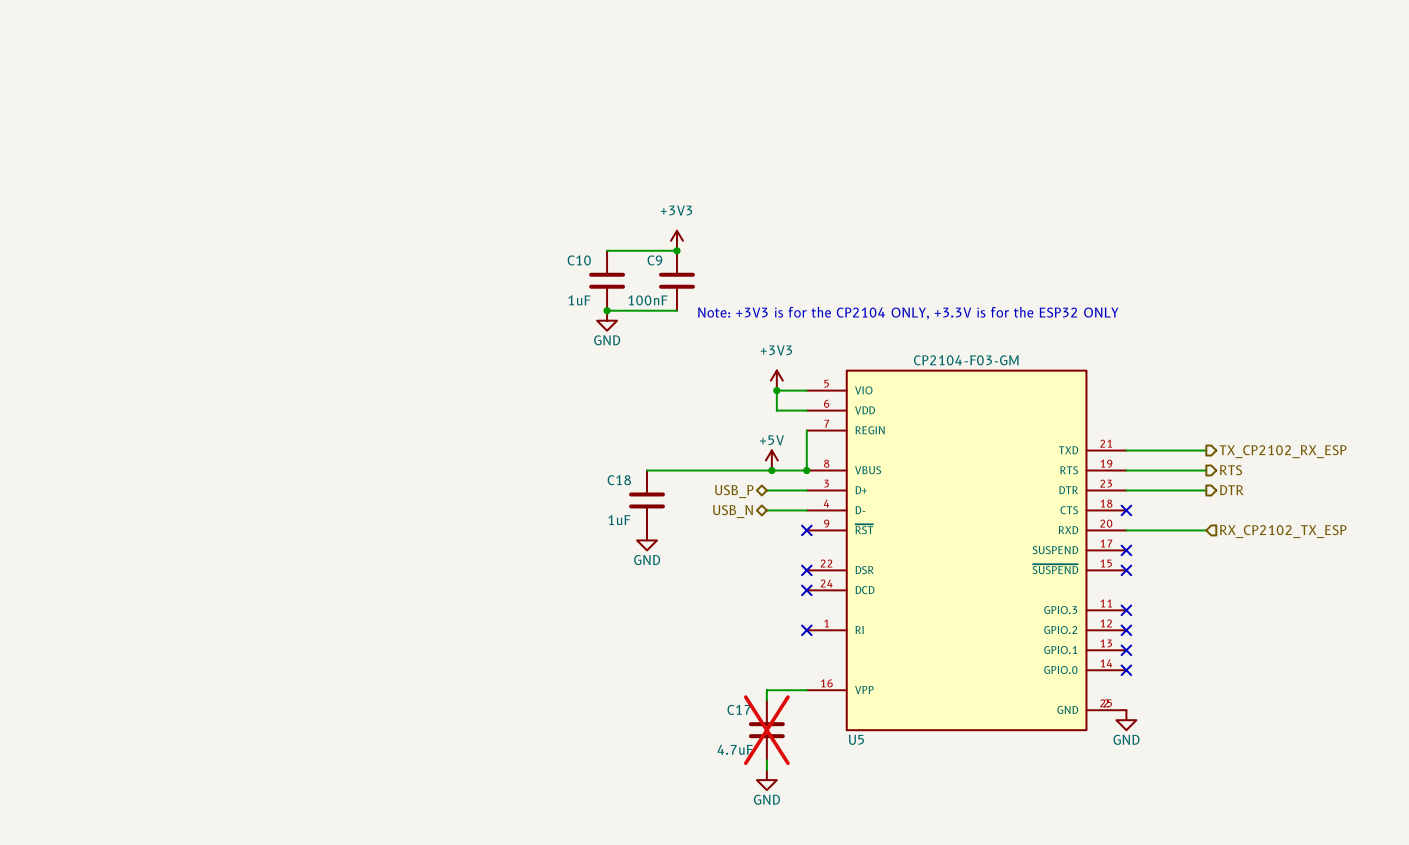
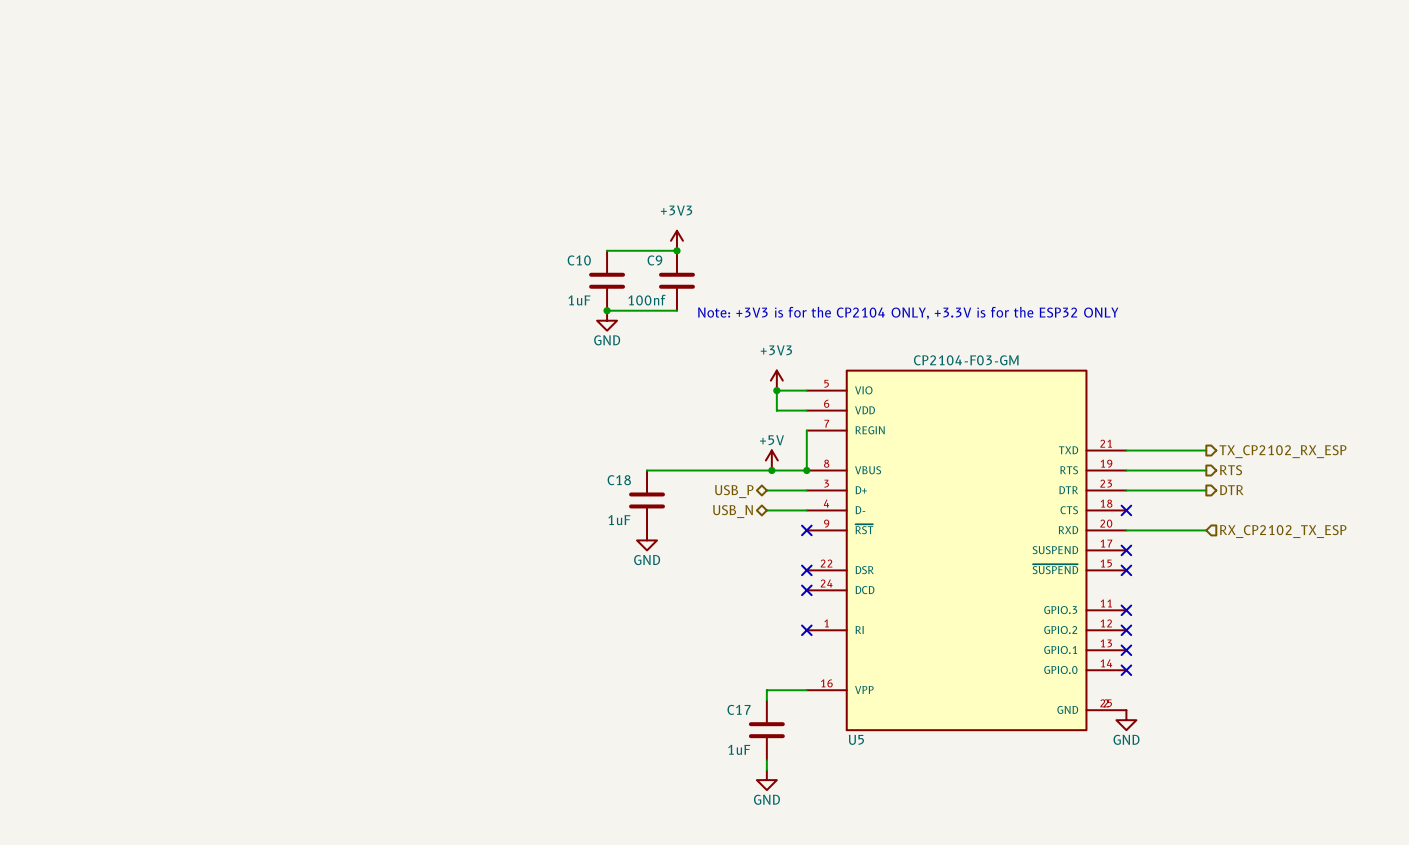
C9 value: 100nF (647, 300) -> 100nf (647, 300)
C17 do-not-place cross: (766, 730) -> none
C17 value: 4.7uF (735, 749) -> 1uF (739, 749)

